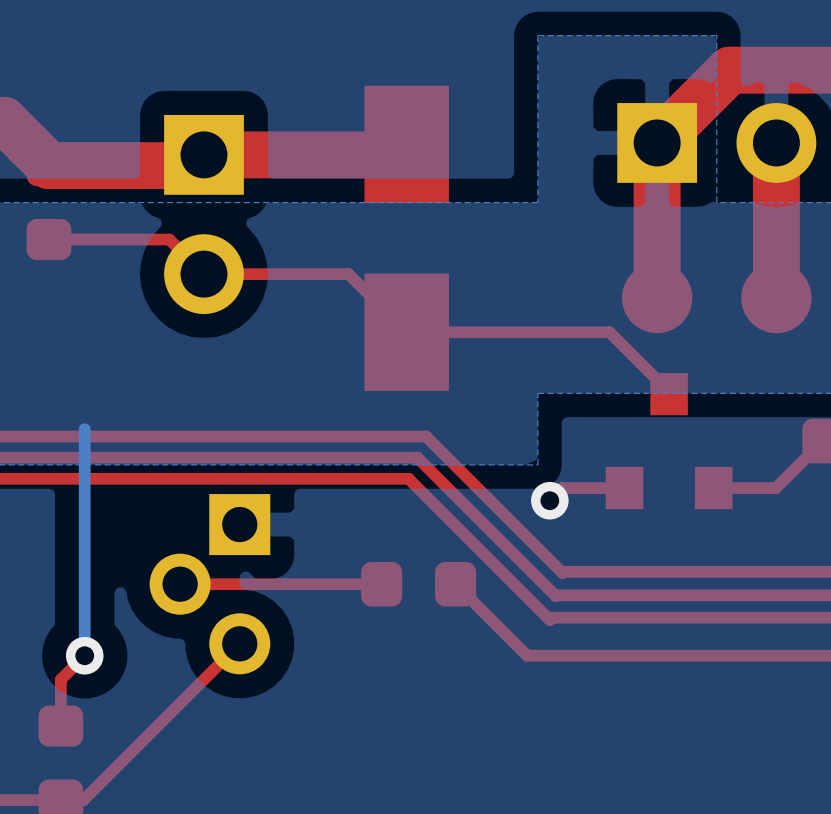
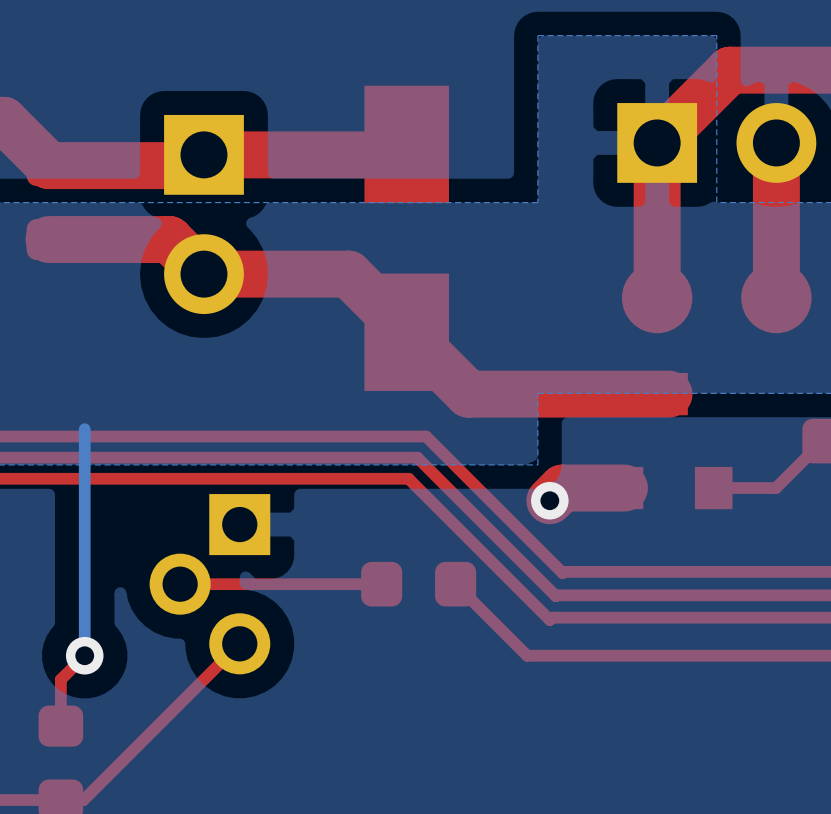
top track width: thin (48, 239) (169, 239) (203, 274) (348, 274) (406, 332) -> thick (48, 239) (169, 239) (203, 274) (348, 274) (406, 332)
top track: (406, 332) (609, 332) (669, 391) (669, 394) -> (406, 332) (468, 394) (669, 394)
top track width: thin (624, 488) (562, 488) (549, 500) -> thick (624, 488) (562, 488) (549, 500)

